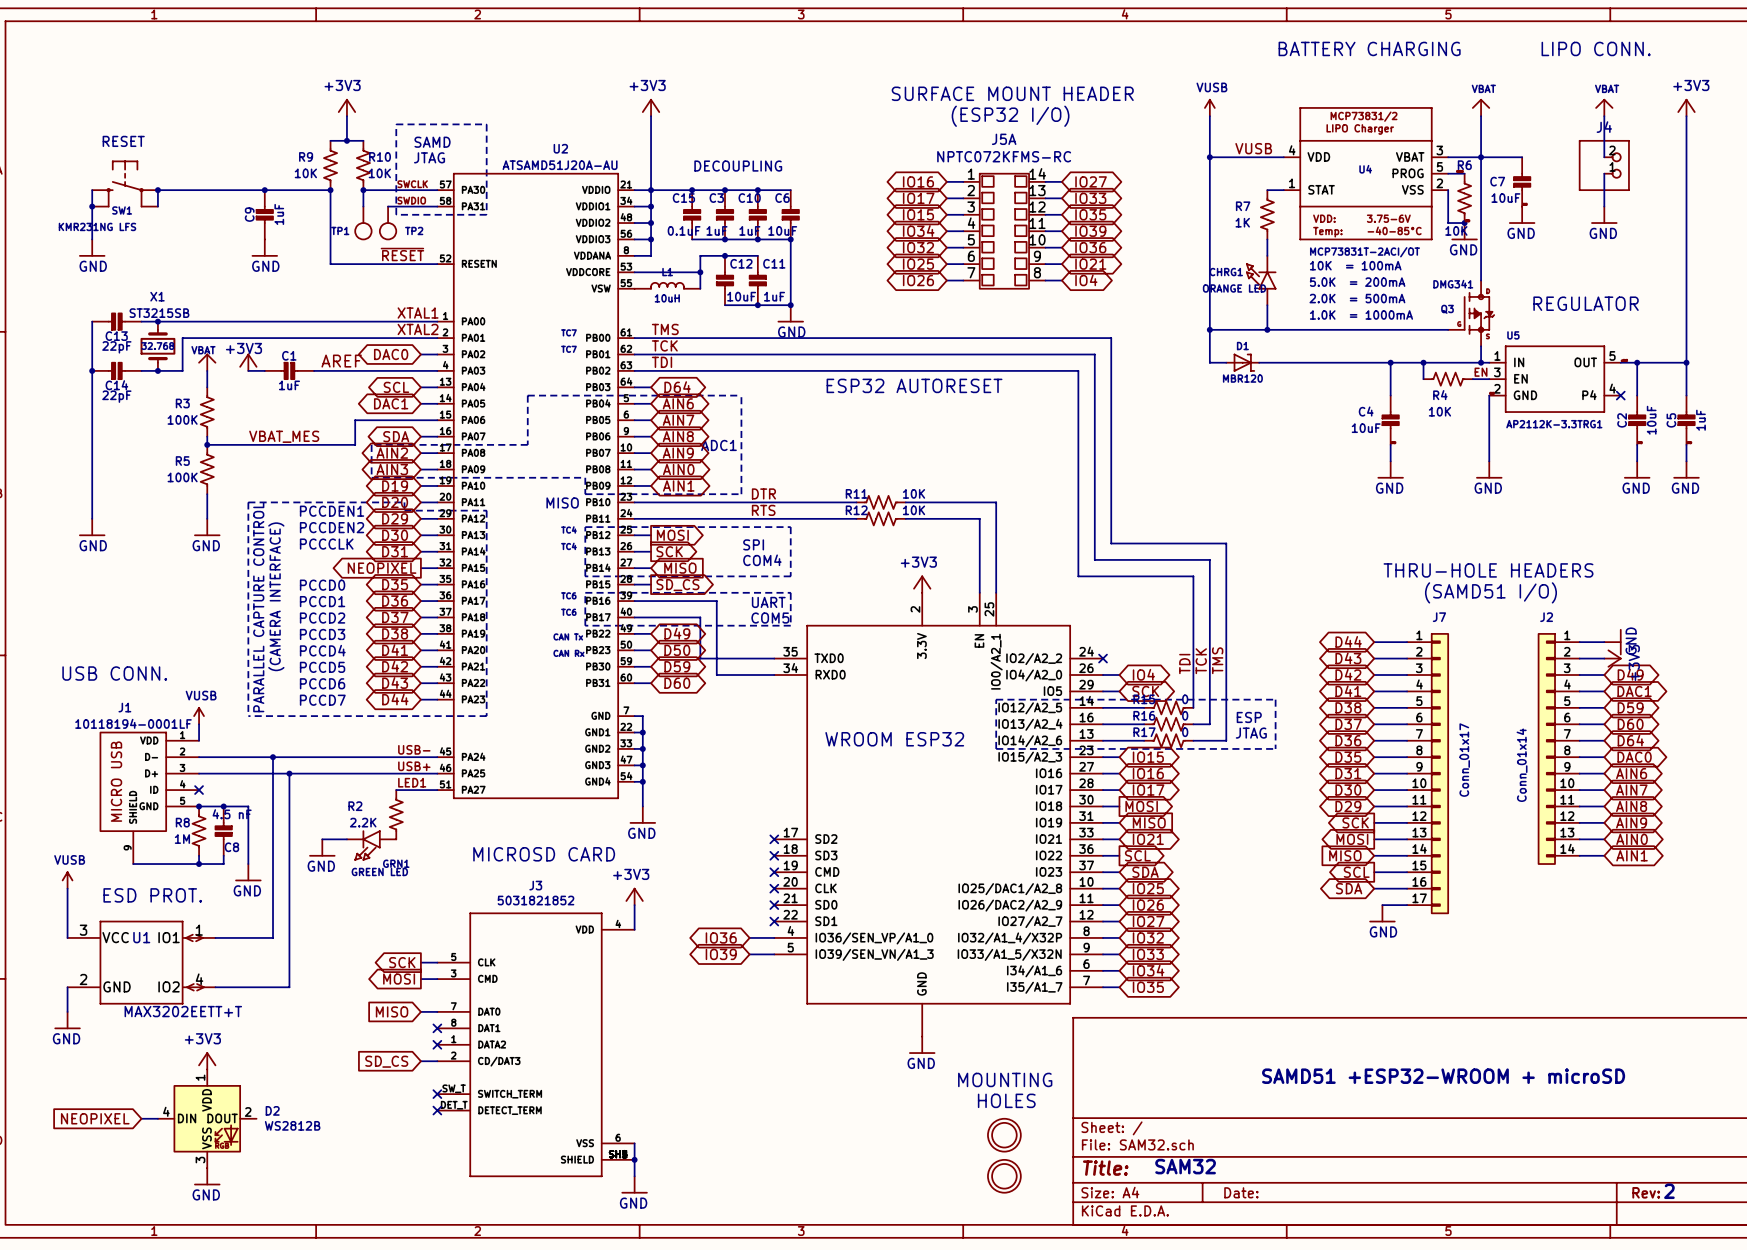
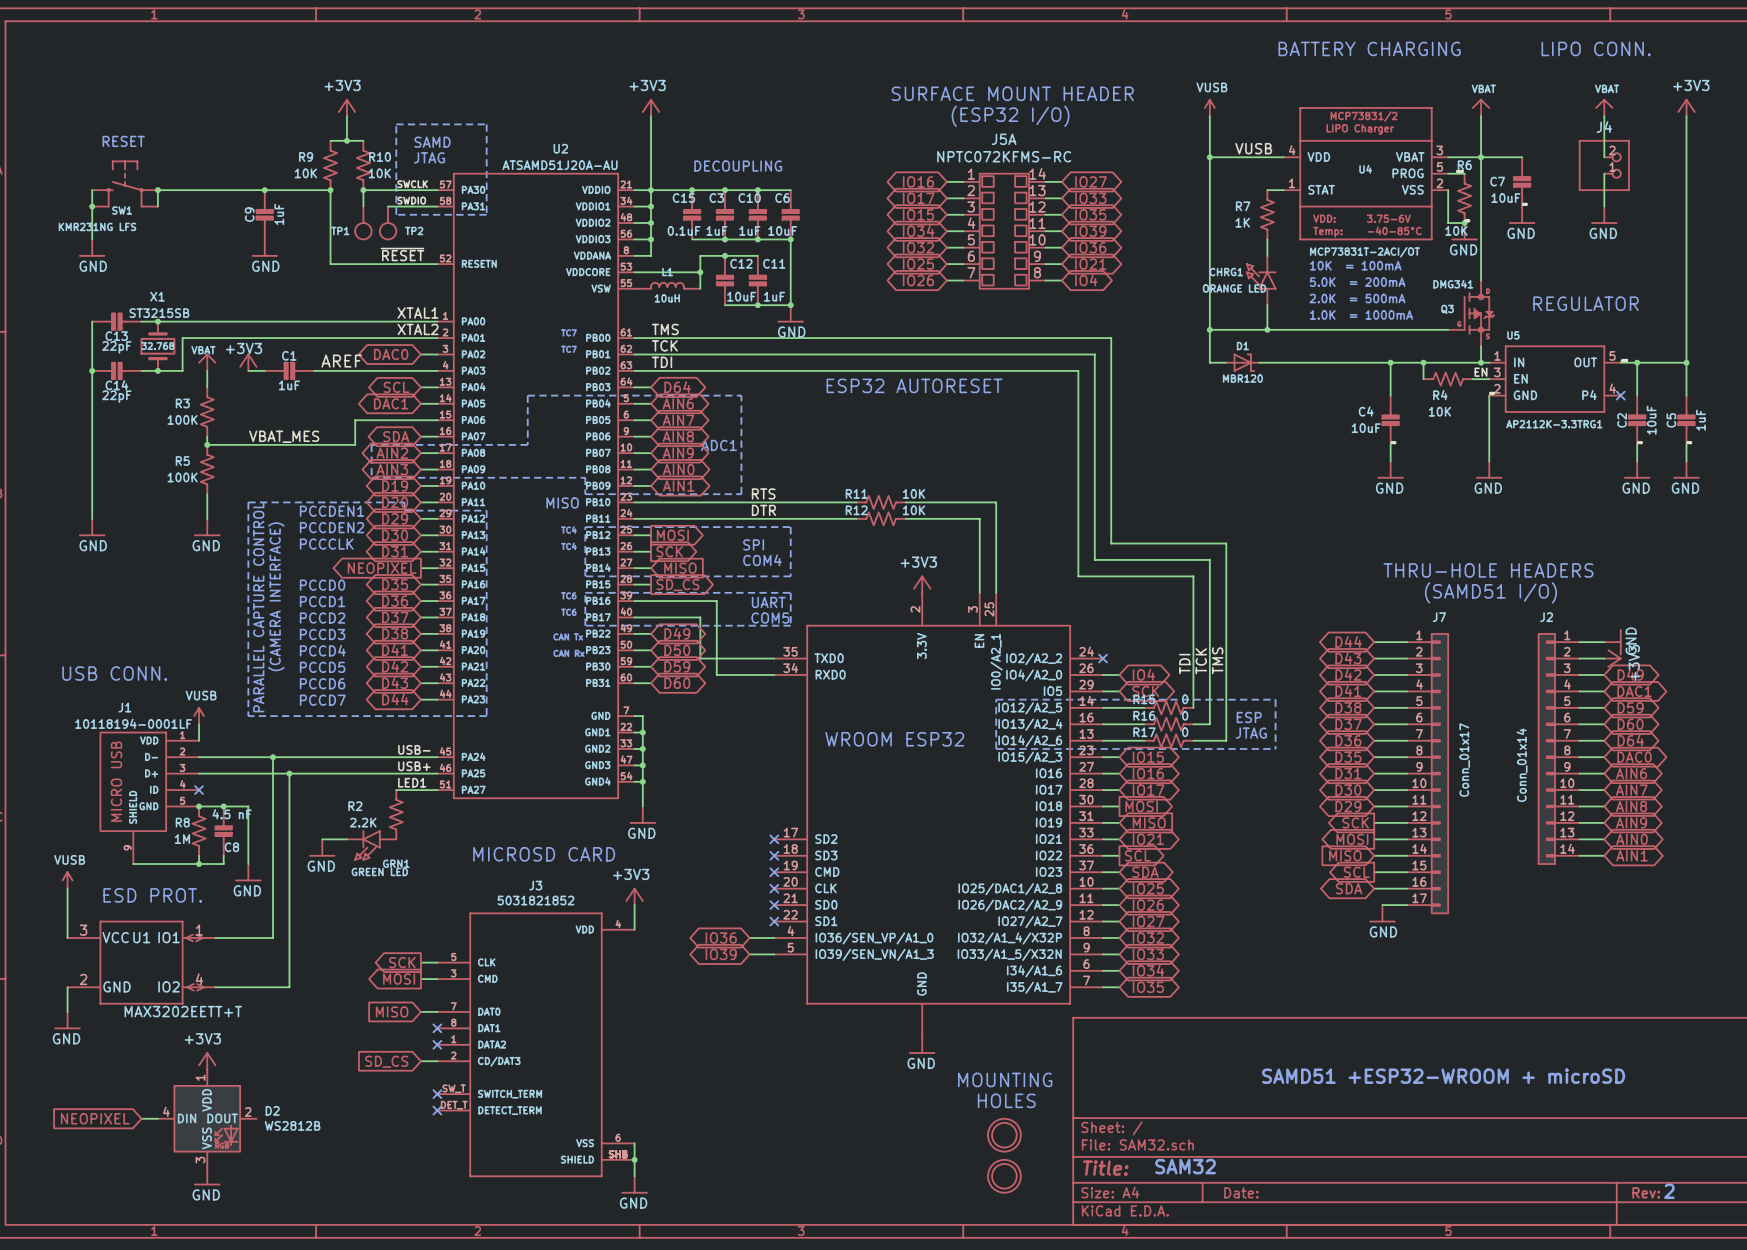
label: DTR (763, 493) -> RTS (763, 493)
label: RTS (763, 510) -> DTR (763, 510)

